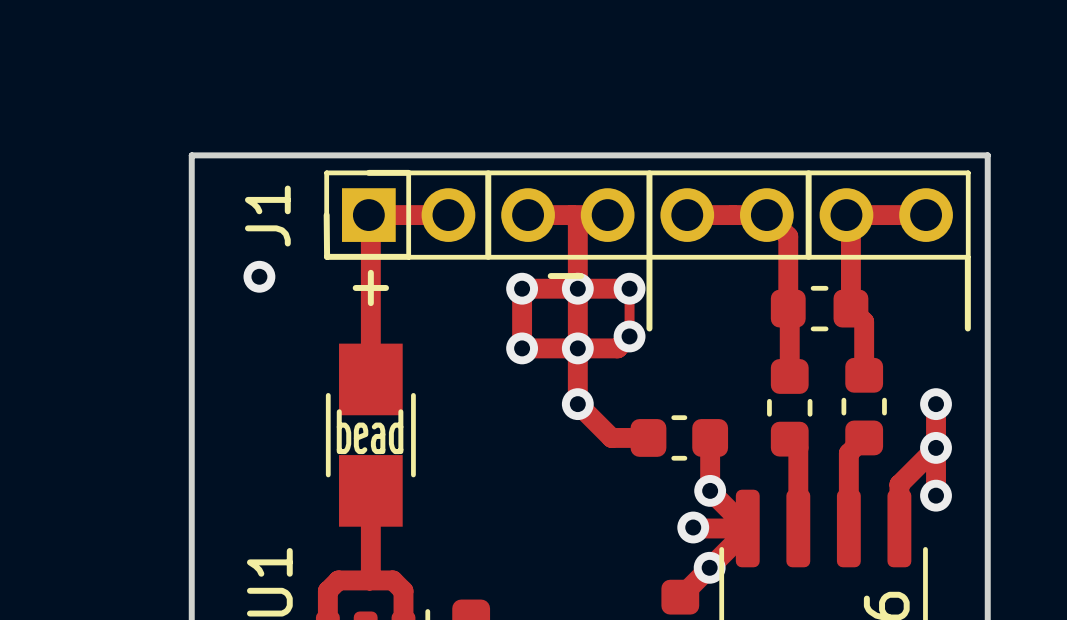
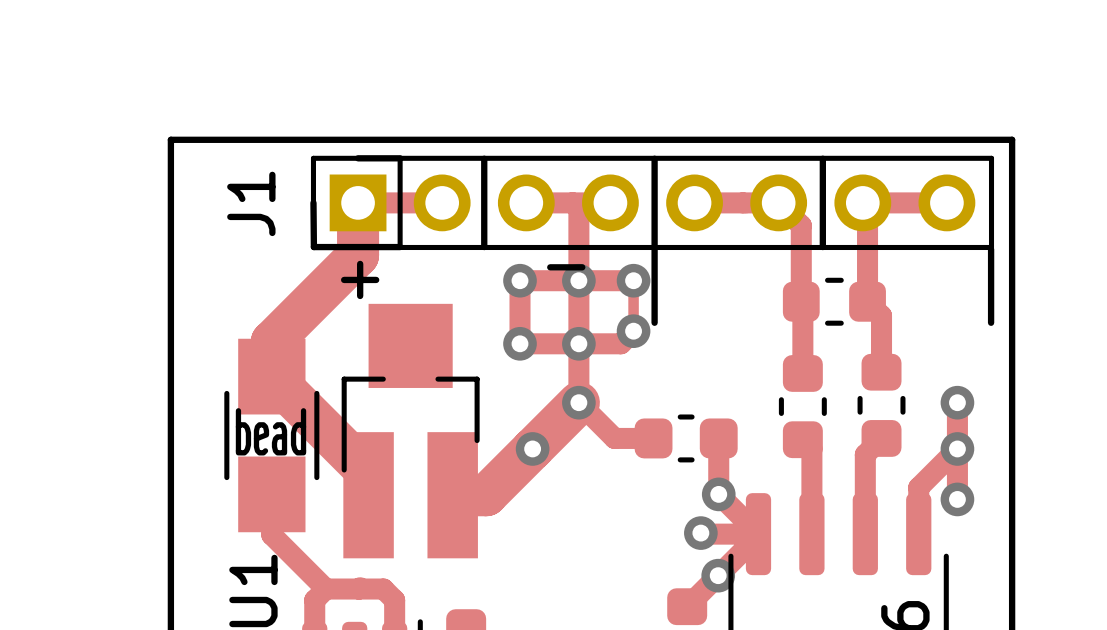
top track: none -> (358, 202) (358, 255) (271, 341) (271, 376) (368, 473) (368, 495)
top track: (370, 217) (370, 379) -> none
via: (259, 276) -> none
top track: none -> (578, 402) (486, 495) (452, 495)
part: none -> (410, 431)
part position: (370, 435) -> (271, 435)
via: none -> (532, 448)
top track: none -> (271, 494) (271, 534) (325, 589)
top track: (370, 490) (370, 579) -> none

